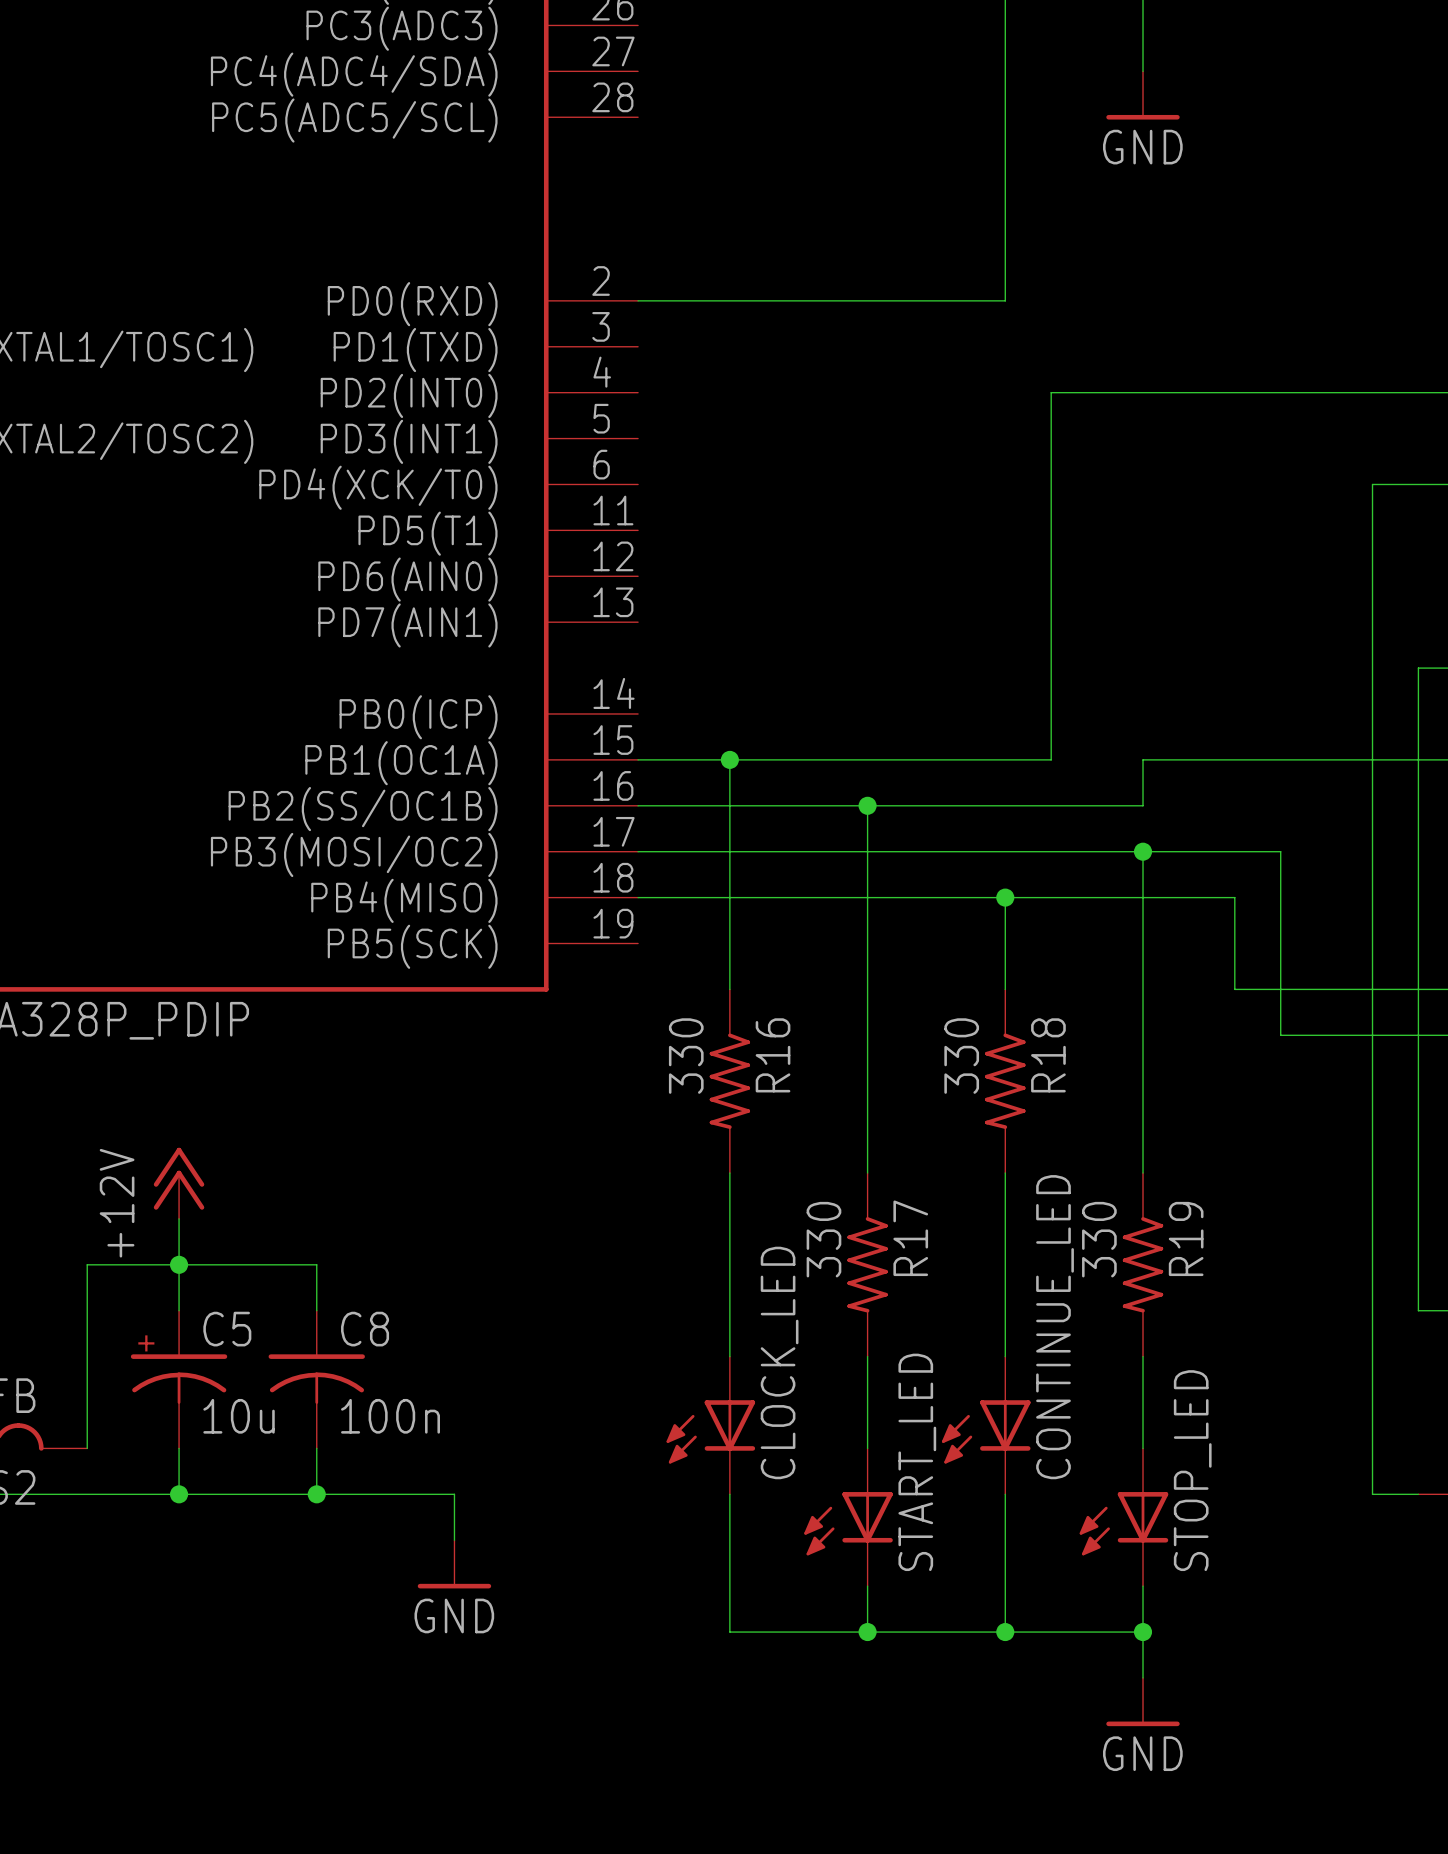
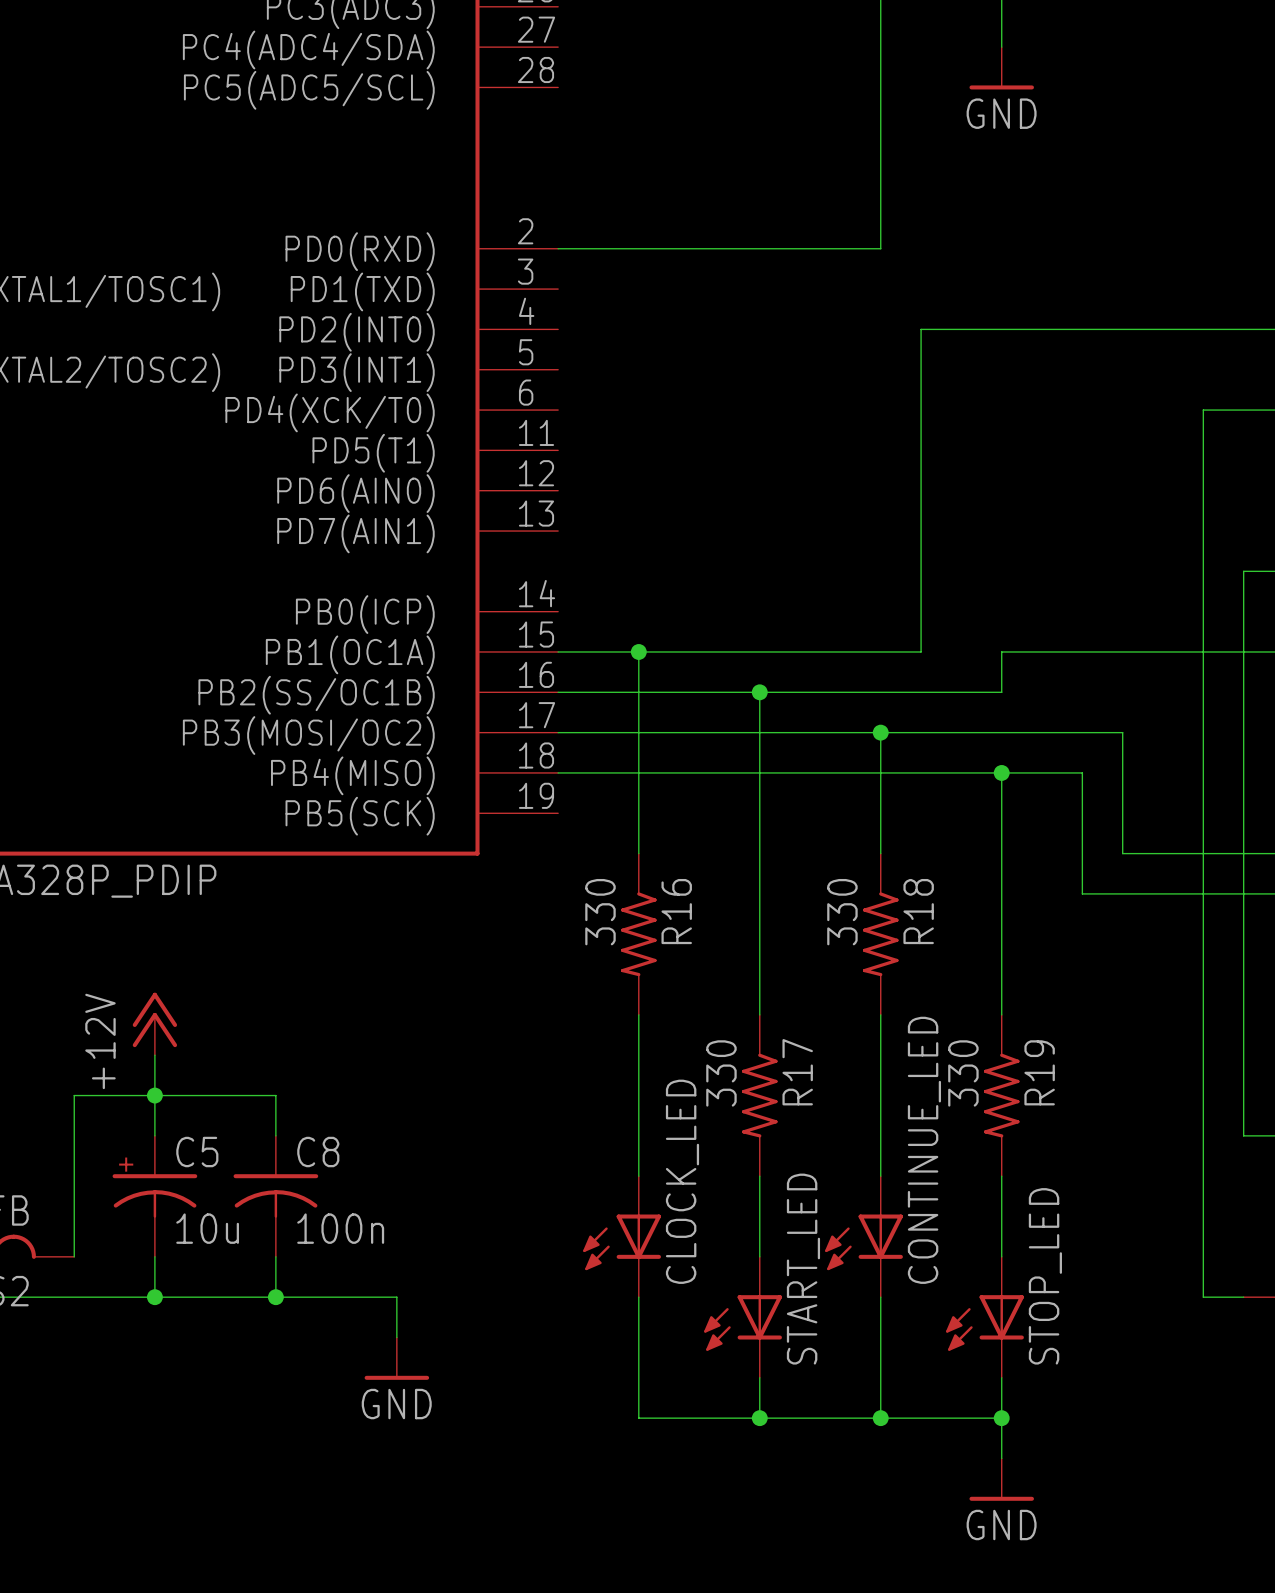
wire: (1143, 851) (1143, 897) -> (880, 732) (880, 772)
junction position: (1143, 851) -> (1001, 772)
junction position: (1005, 897) -> (880, 732)
wire: (1234, 989) (1280, 989) (1280, 1035) -> (1082, 853) (1082, 893) (1122, 893)

